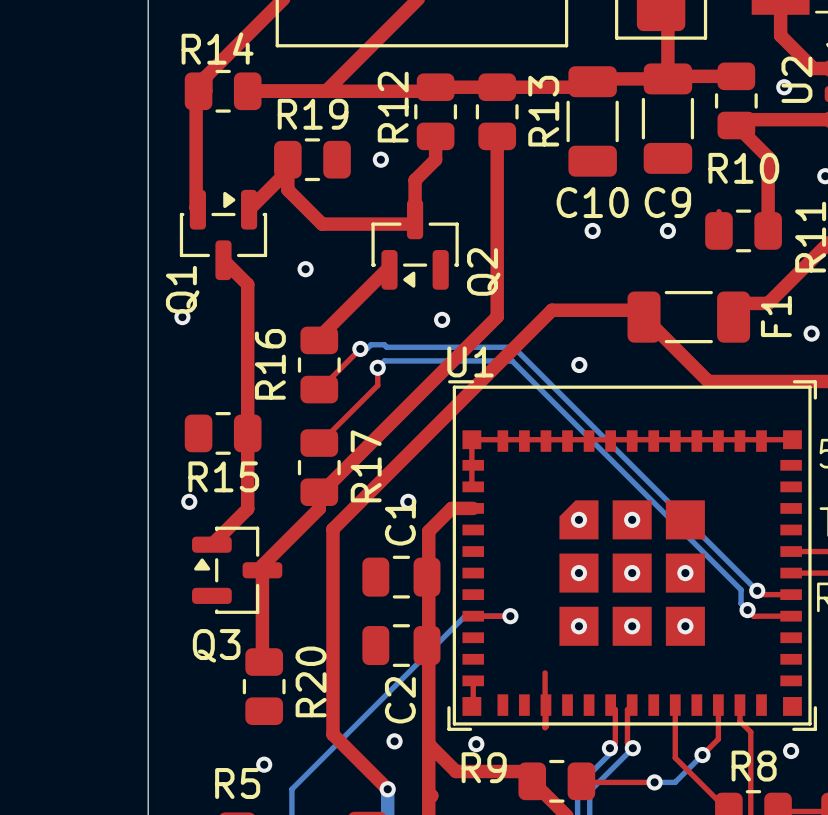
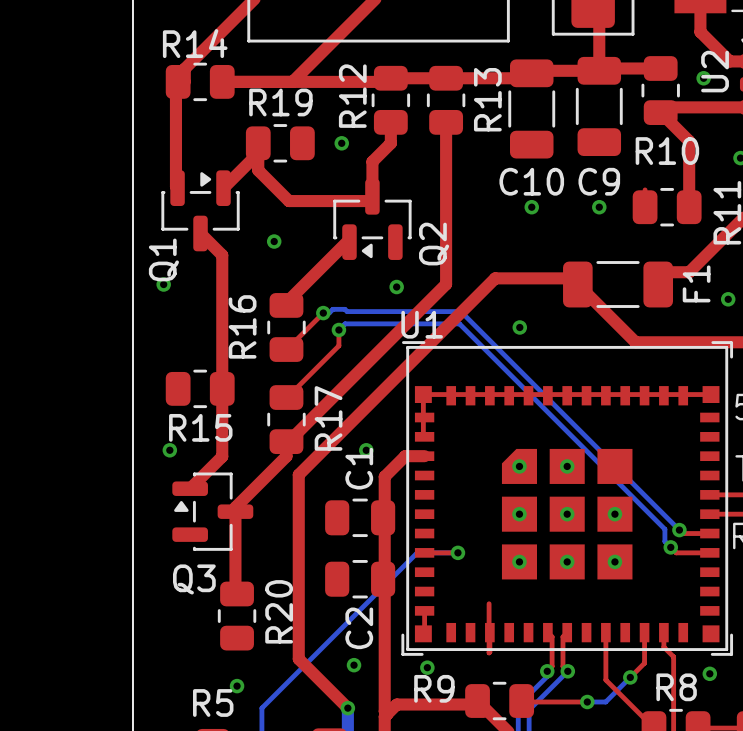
top track: (428, 744) (456, 771) (522, 771) (532, 781) -> (387, 714) (396, 704) (474, 704) (477, 701)

